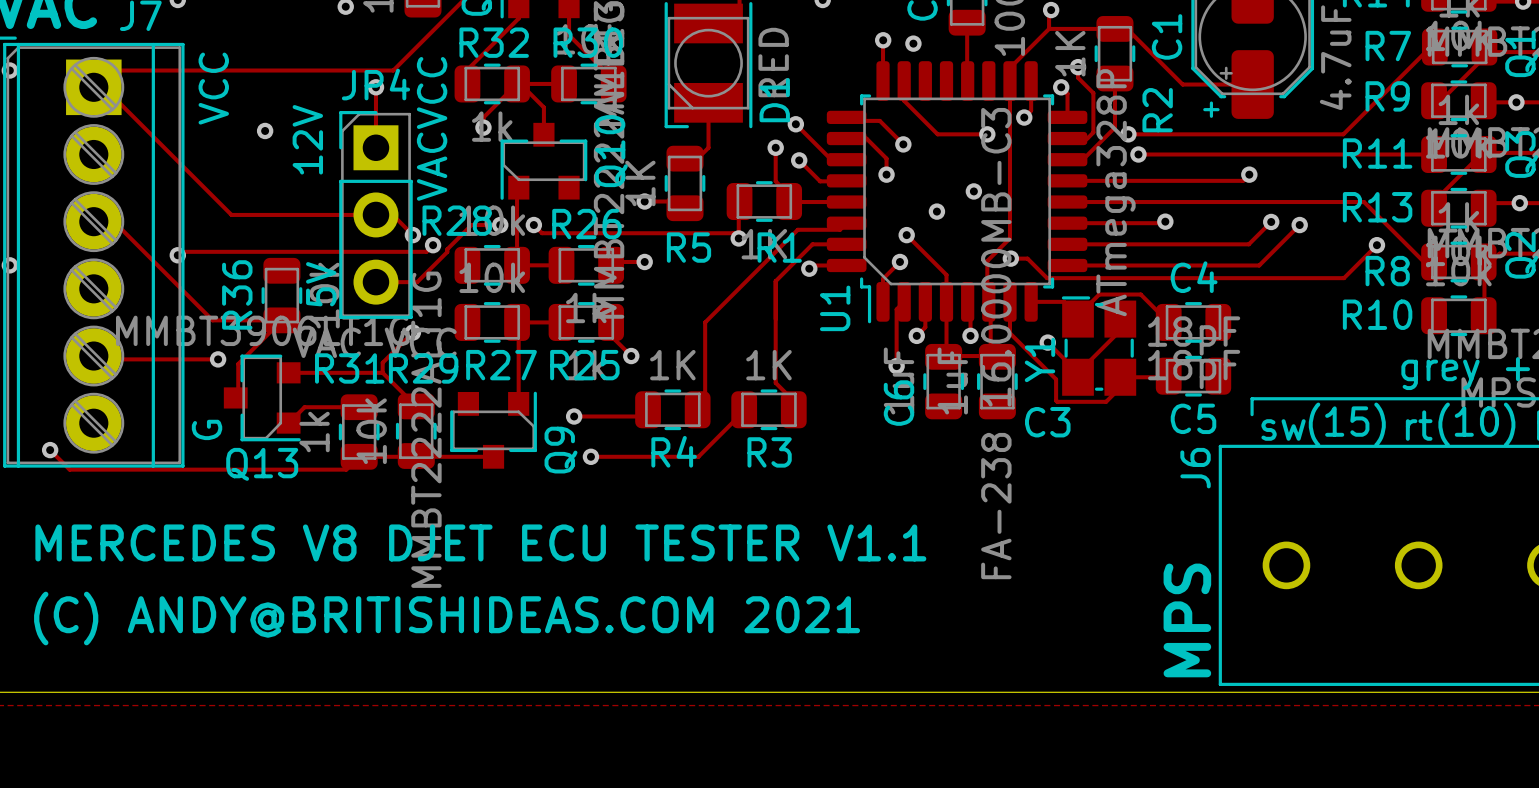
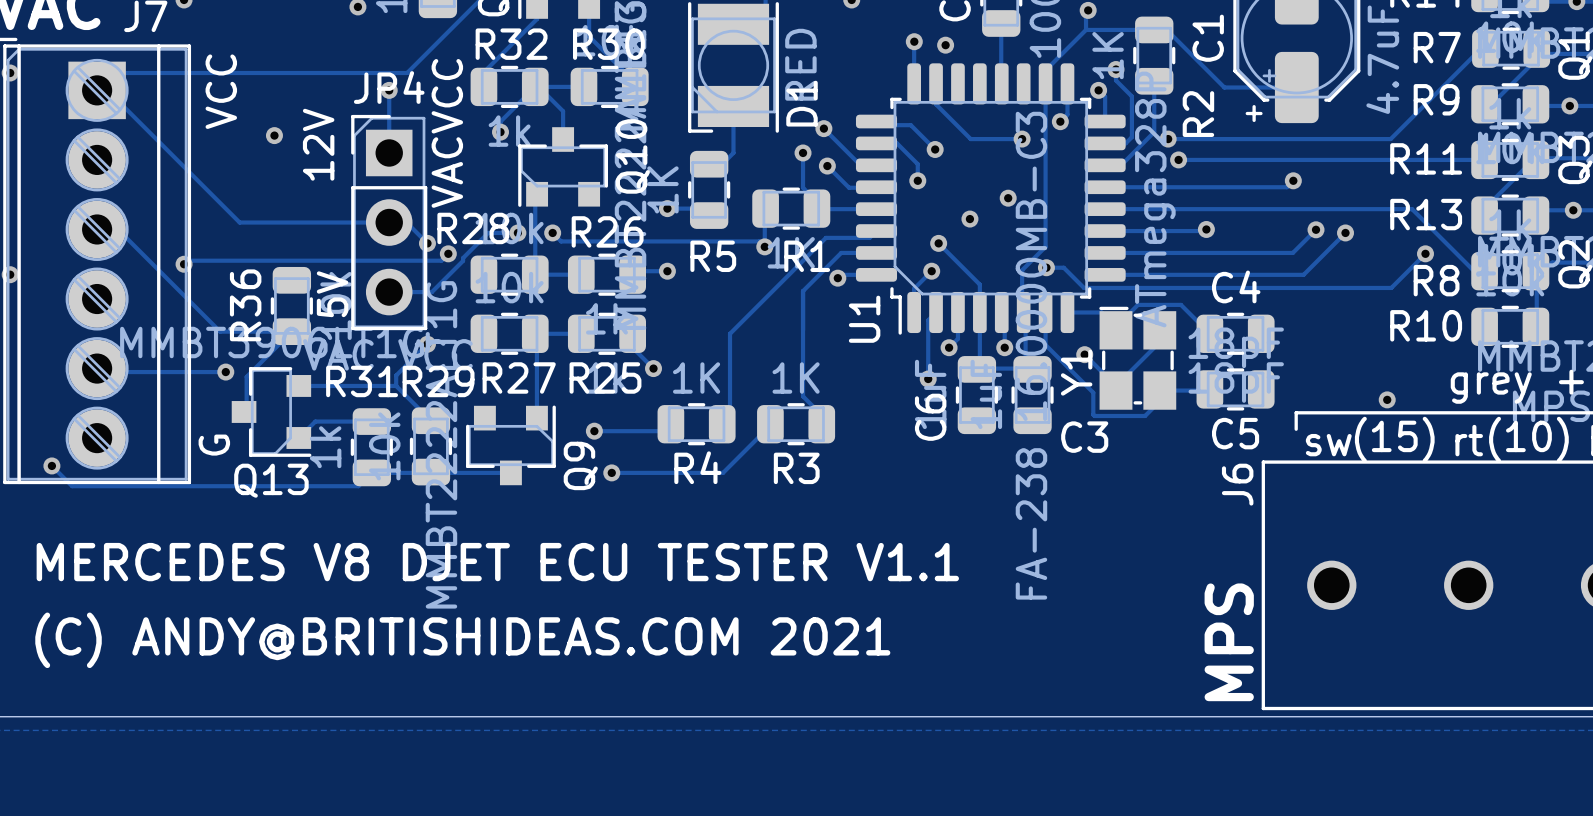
via: none -> (1387, 399)

